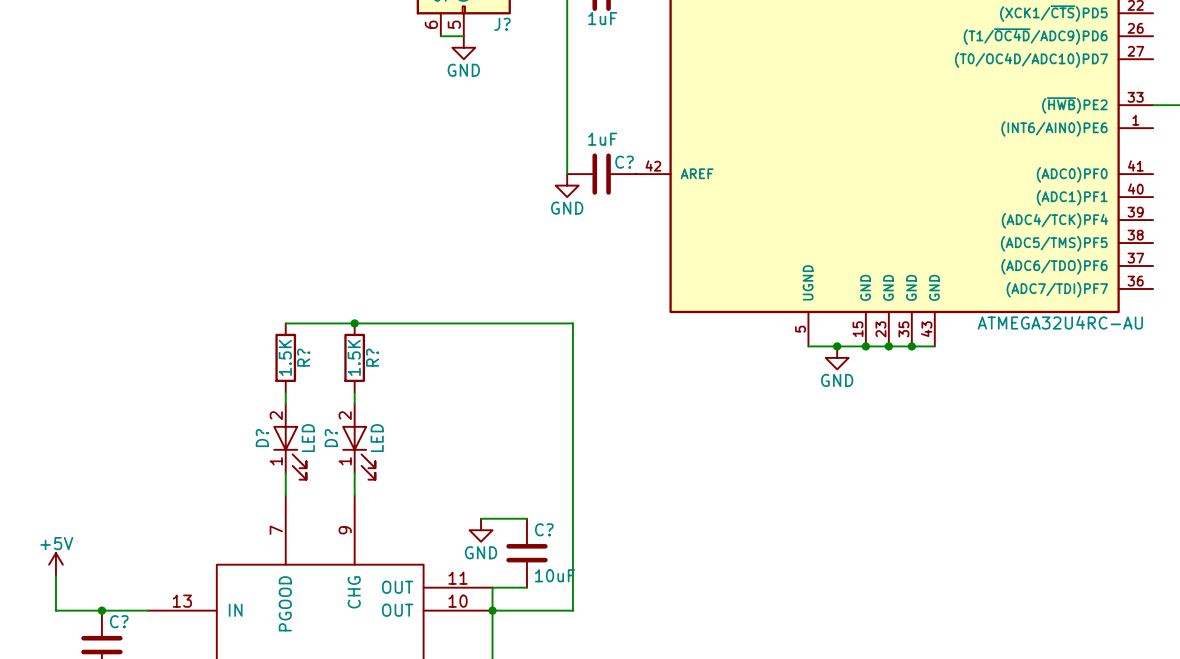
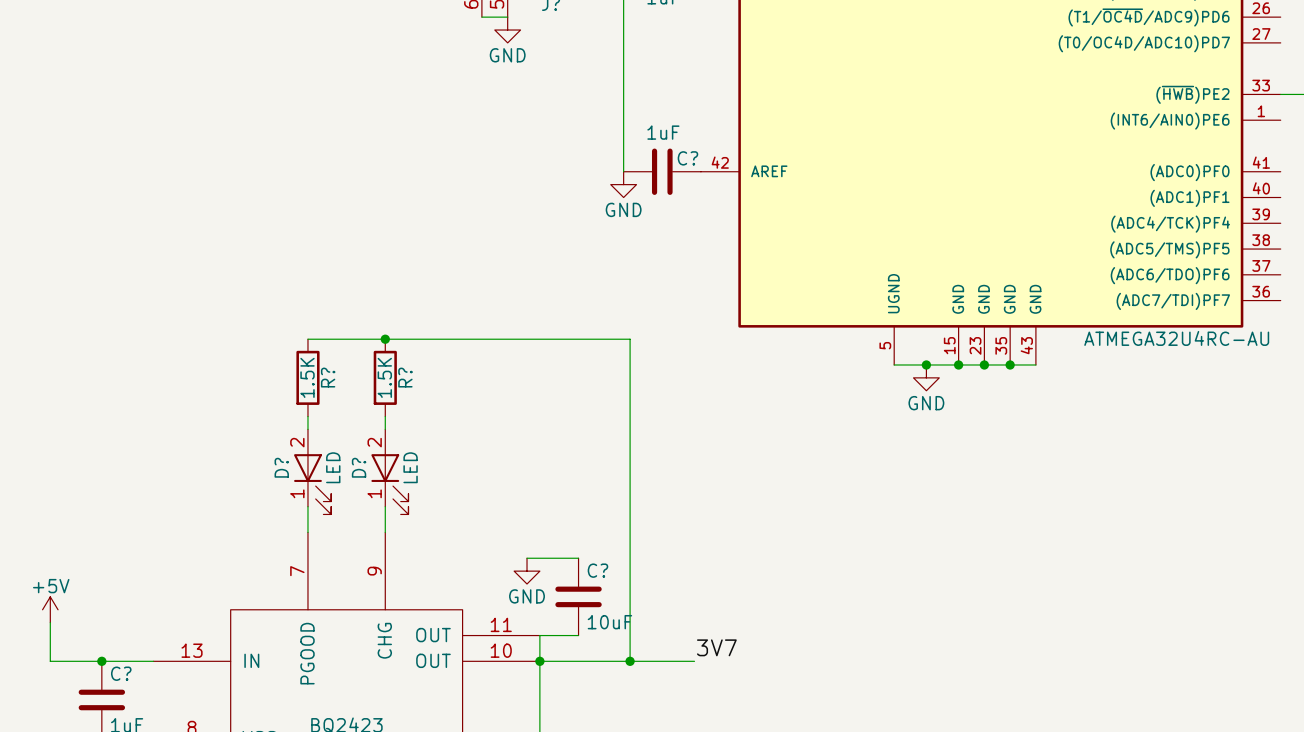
label: none -> 3V7 (716, 647)
wire: none -> (630, 661) (694, 661)
junction: none -> (630, 661)

